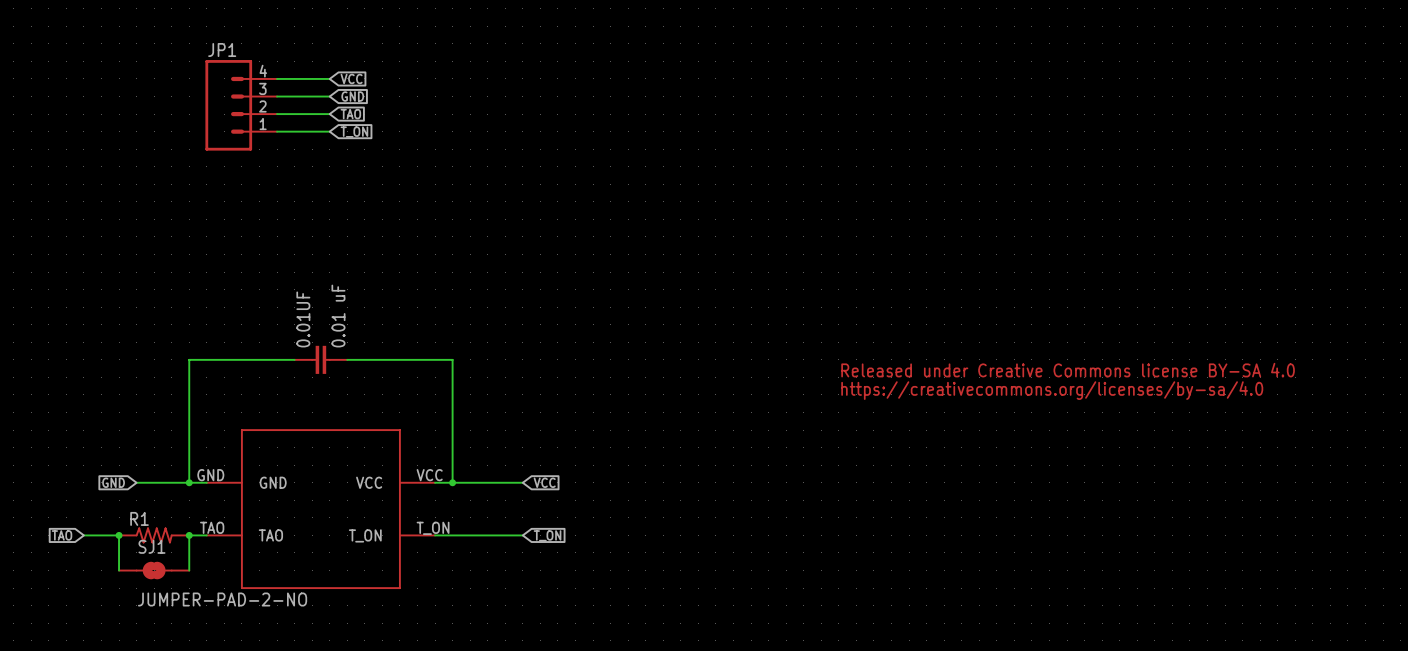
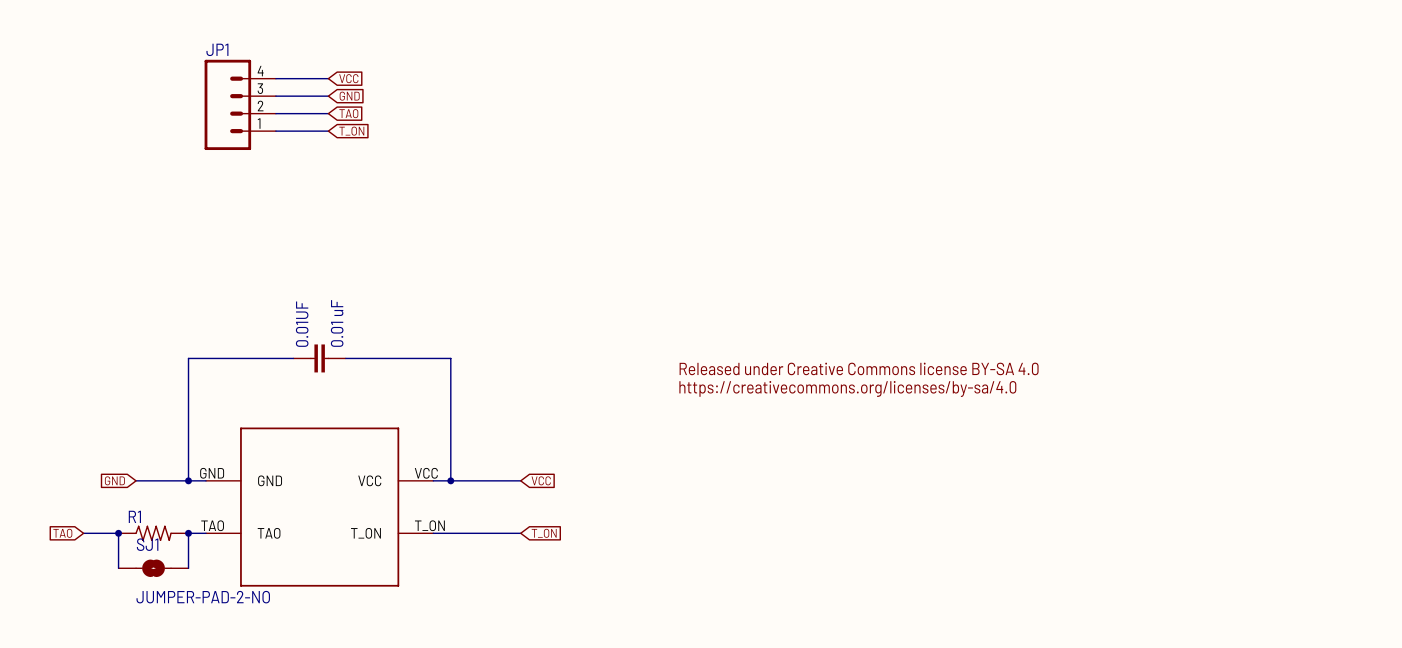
text position: Released under Creative Commons license BY-SA 4.0 (1068, 370) -> Released under Creative Commons license BY-SA 4.0 (859, 368)
text position: https://creativecommons.org/licenses/by-sa/4.0 (1052, 390) -> https://creativecommons.org/licenses/by-sa/4.0 (847, 388)

